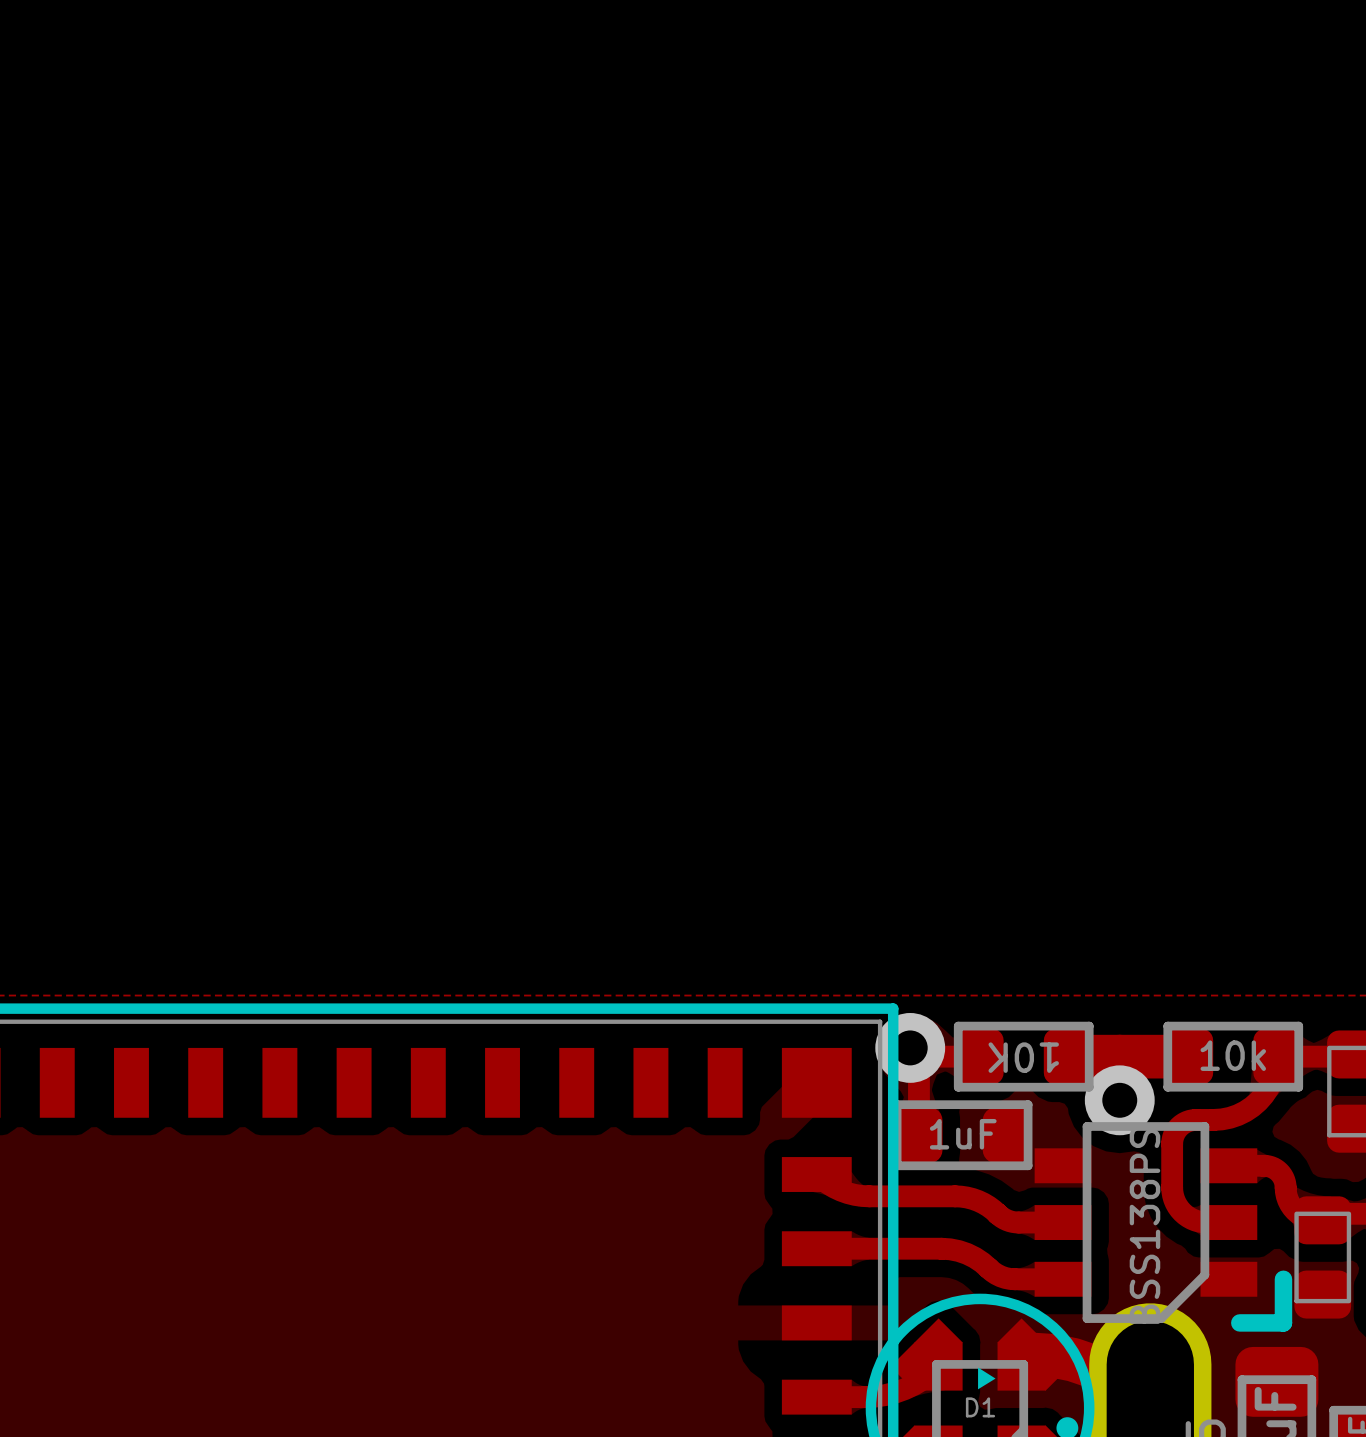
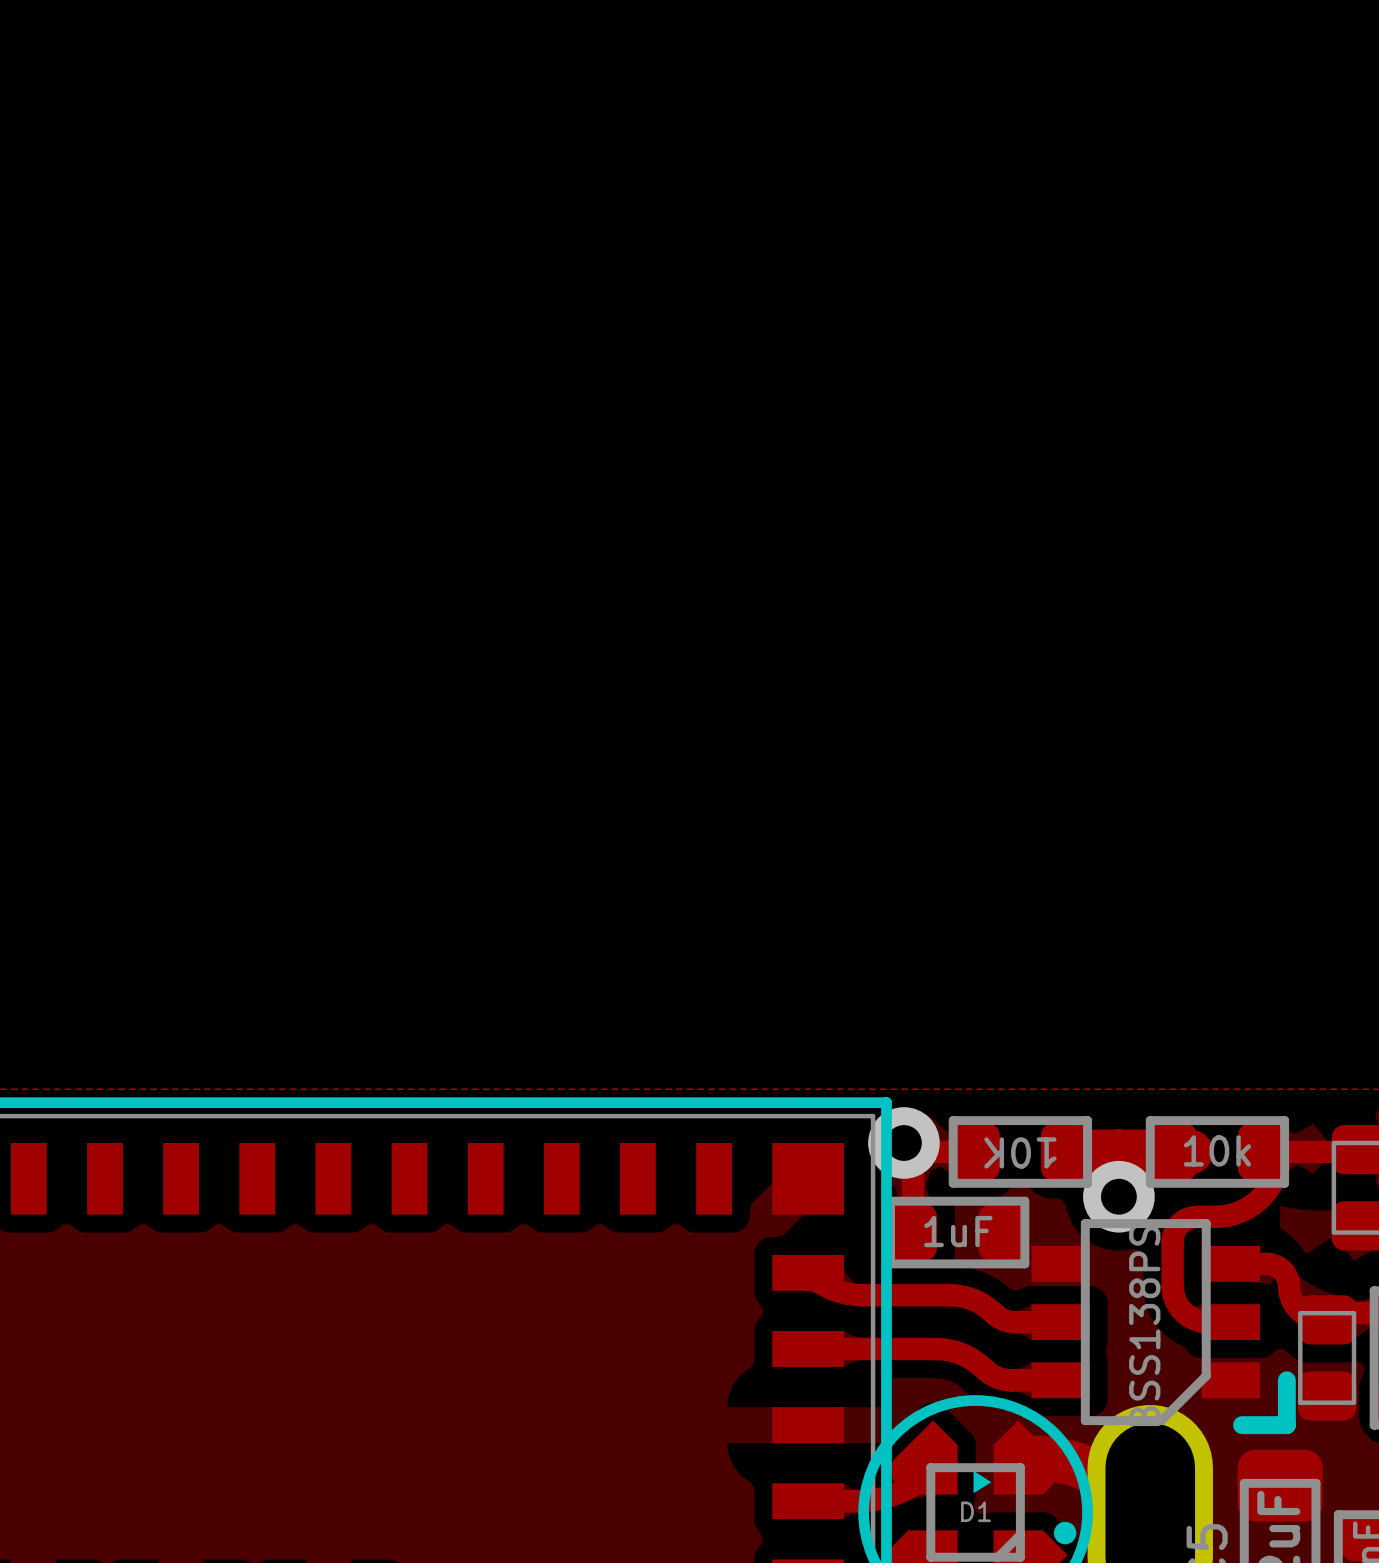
part position: (1233, 1056) -> (1217, 1151)

